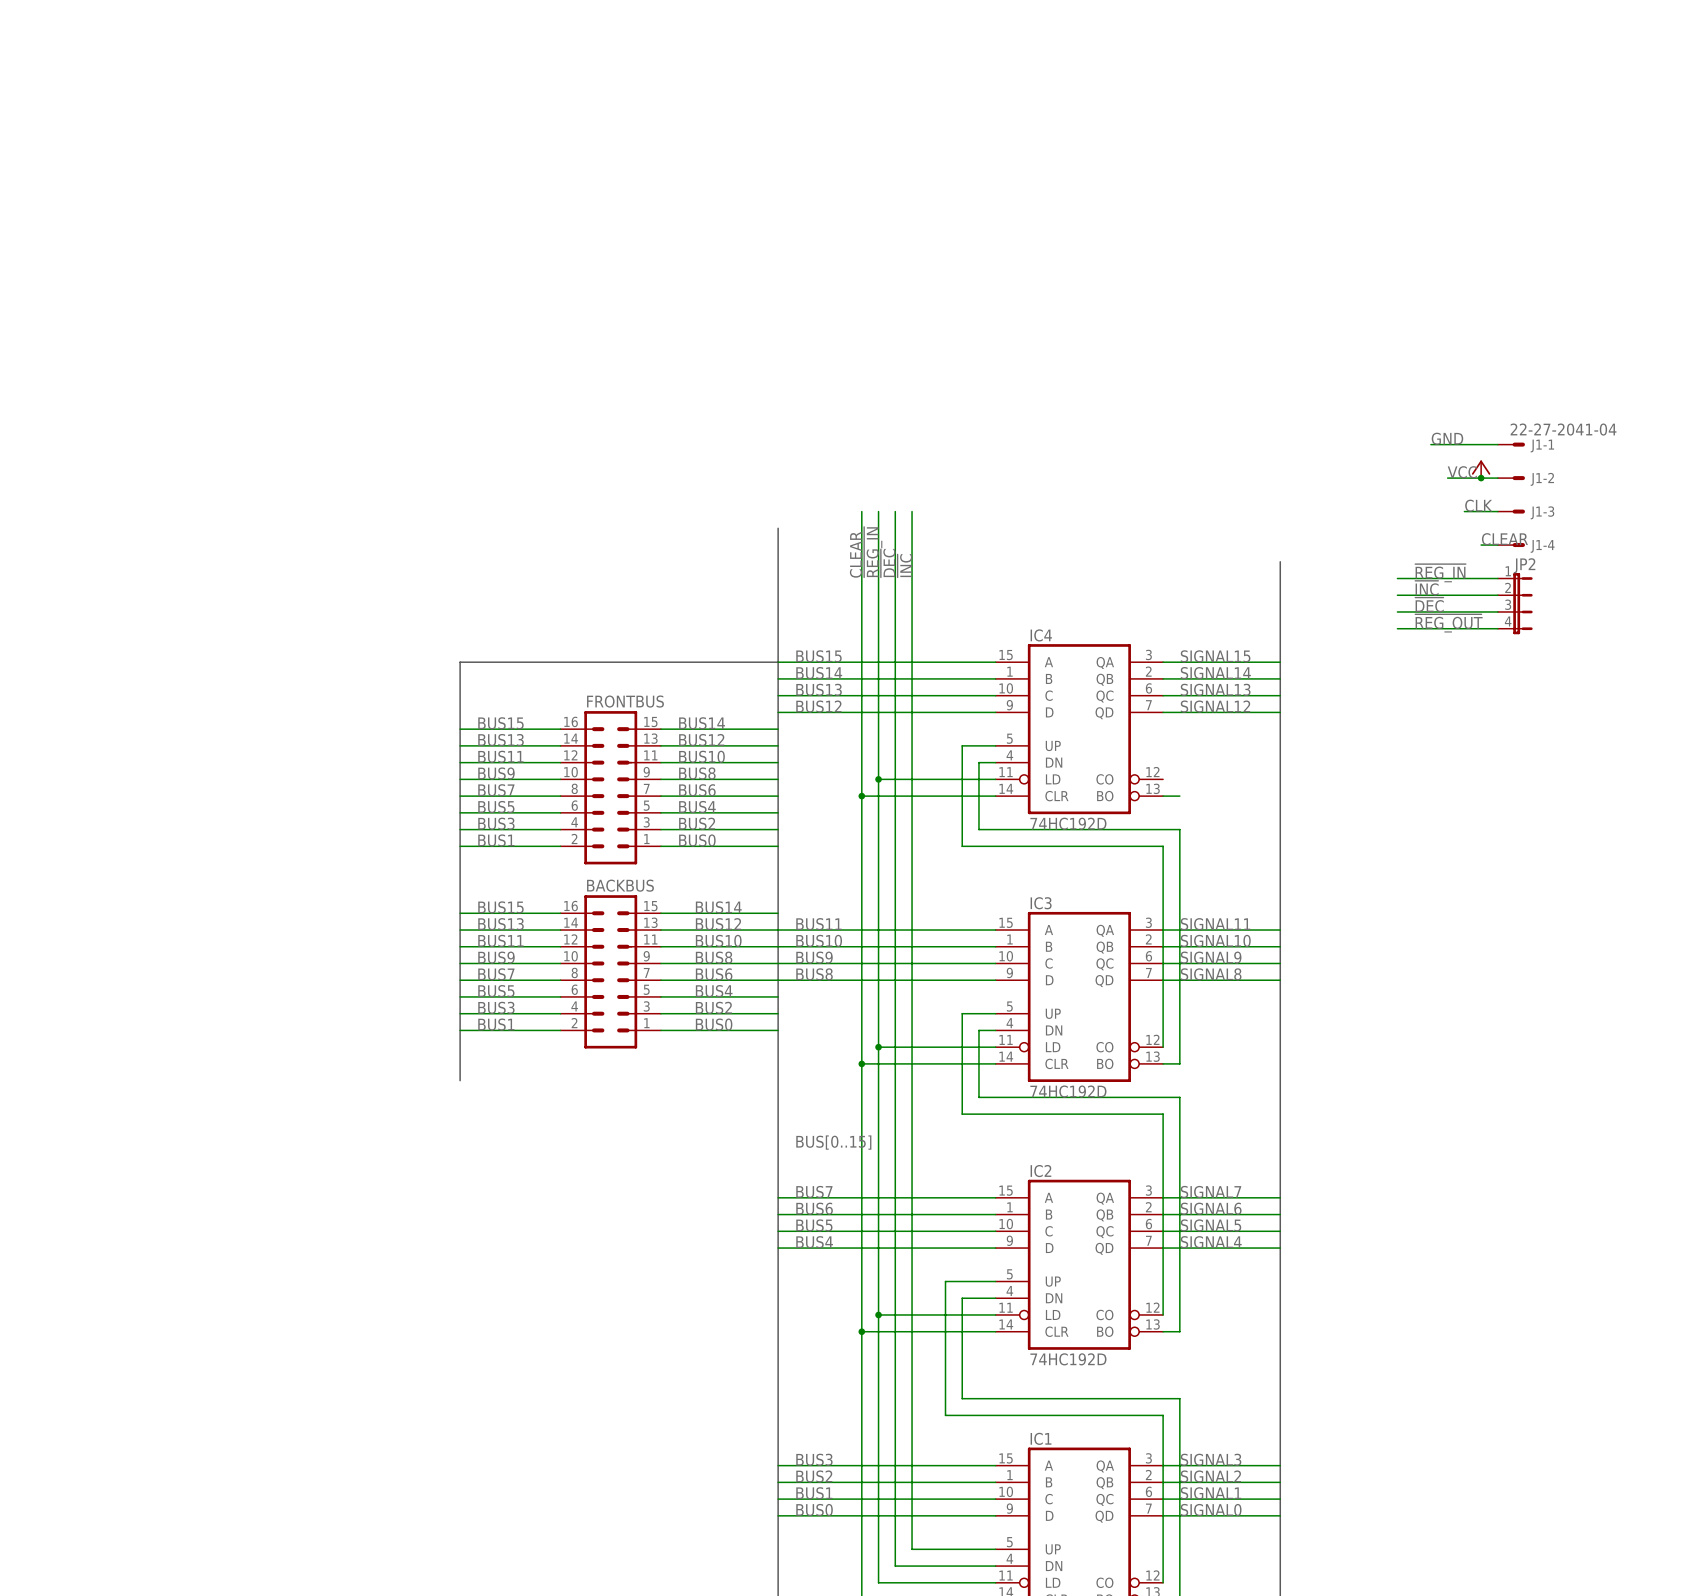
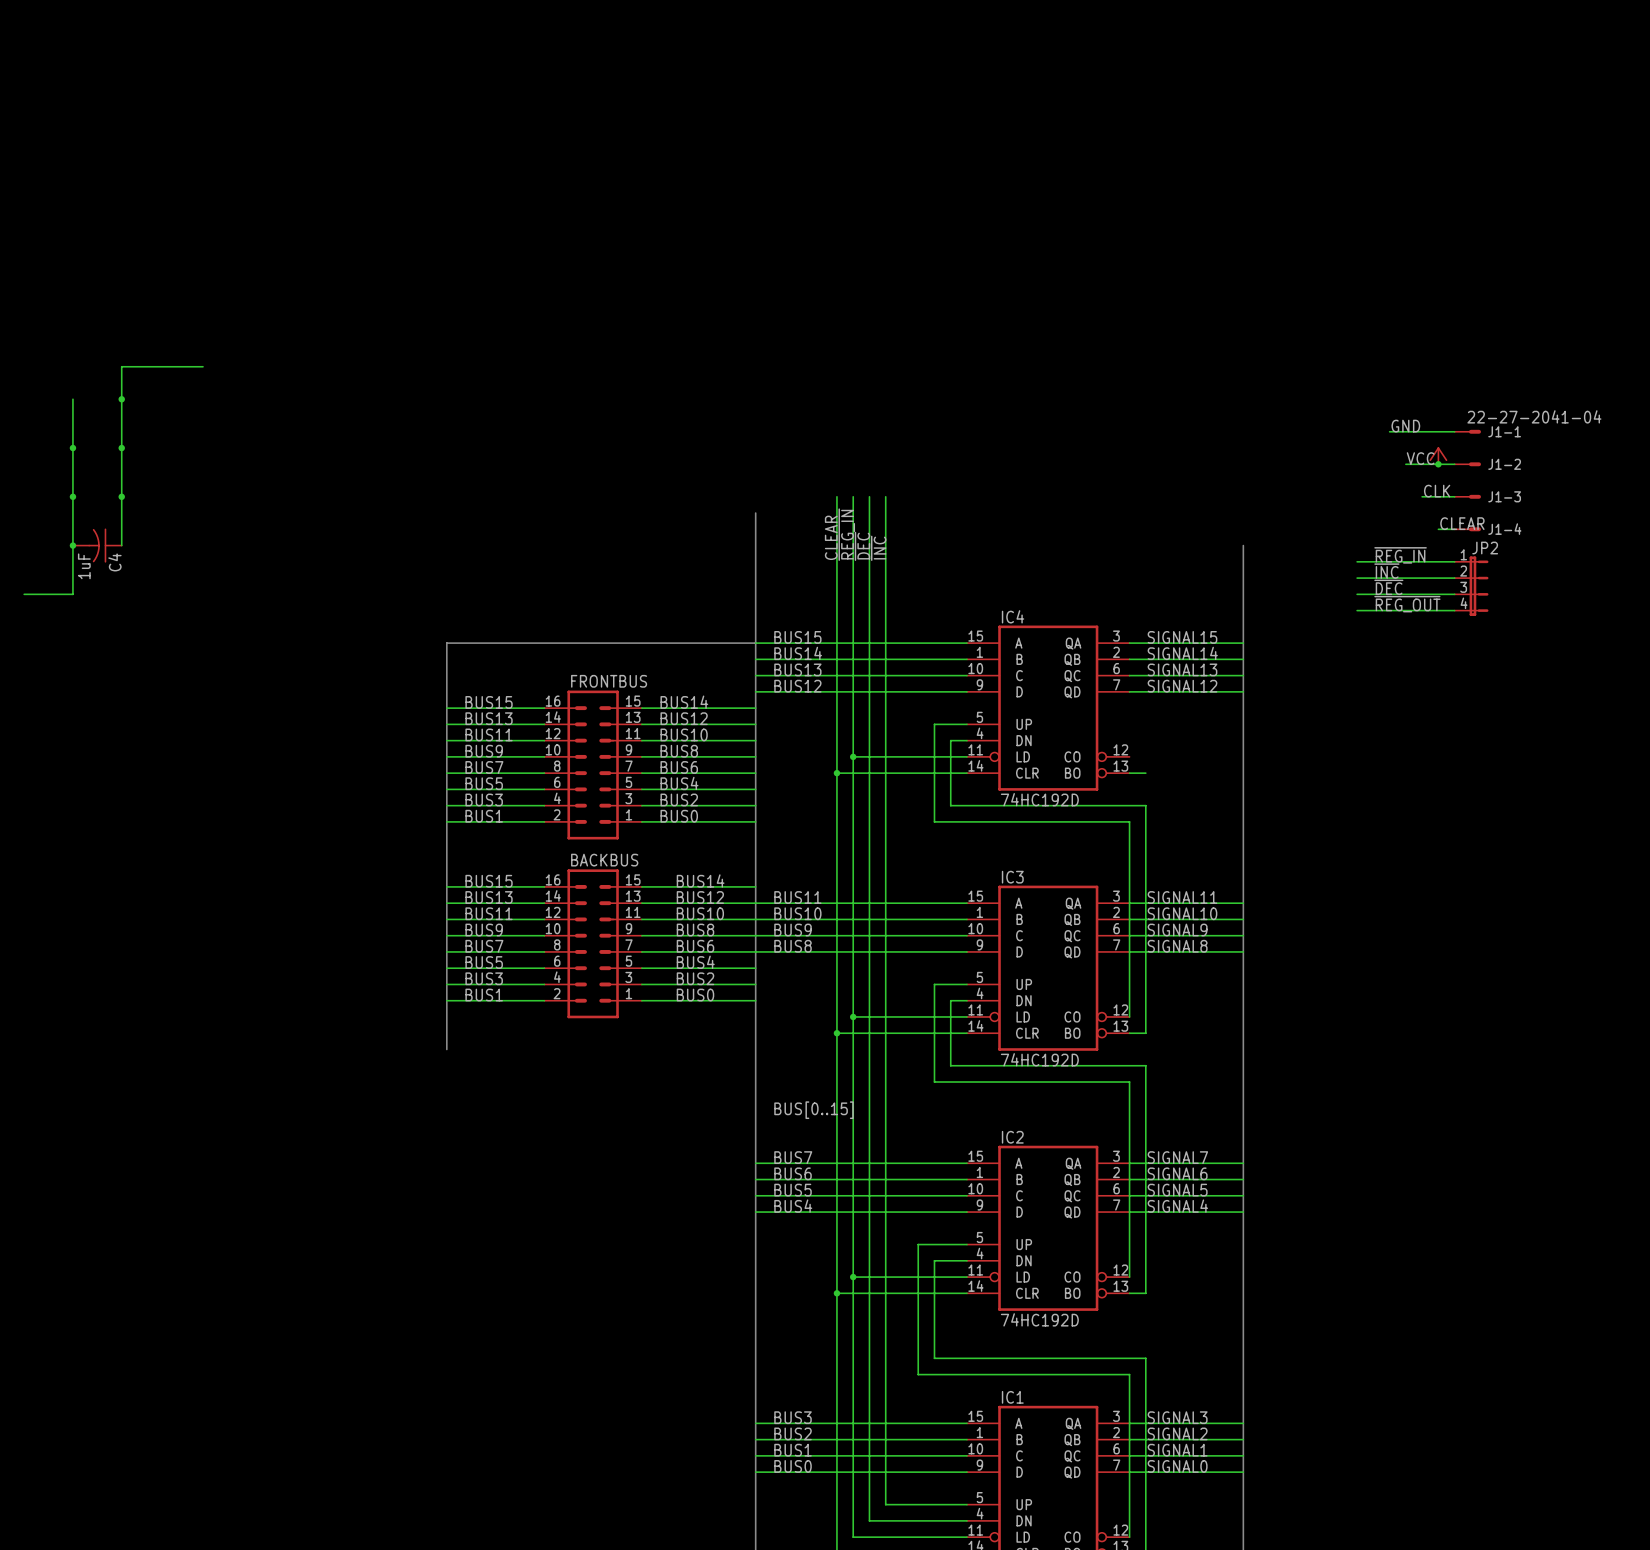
wire: none -> (203, 366) (121, 366) (121, 545)
wire: none -> (72, 399) (72, 594) (24, 594)
junction: none -> (121, 399)
junction: none -> (72, 448)
junction: none -> (121, 448)
junction: none -> (72, 496)
junction: none -> (121, 496)
junction: none -> (72, 545)
C4: none -> 1uF (97, 545)

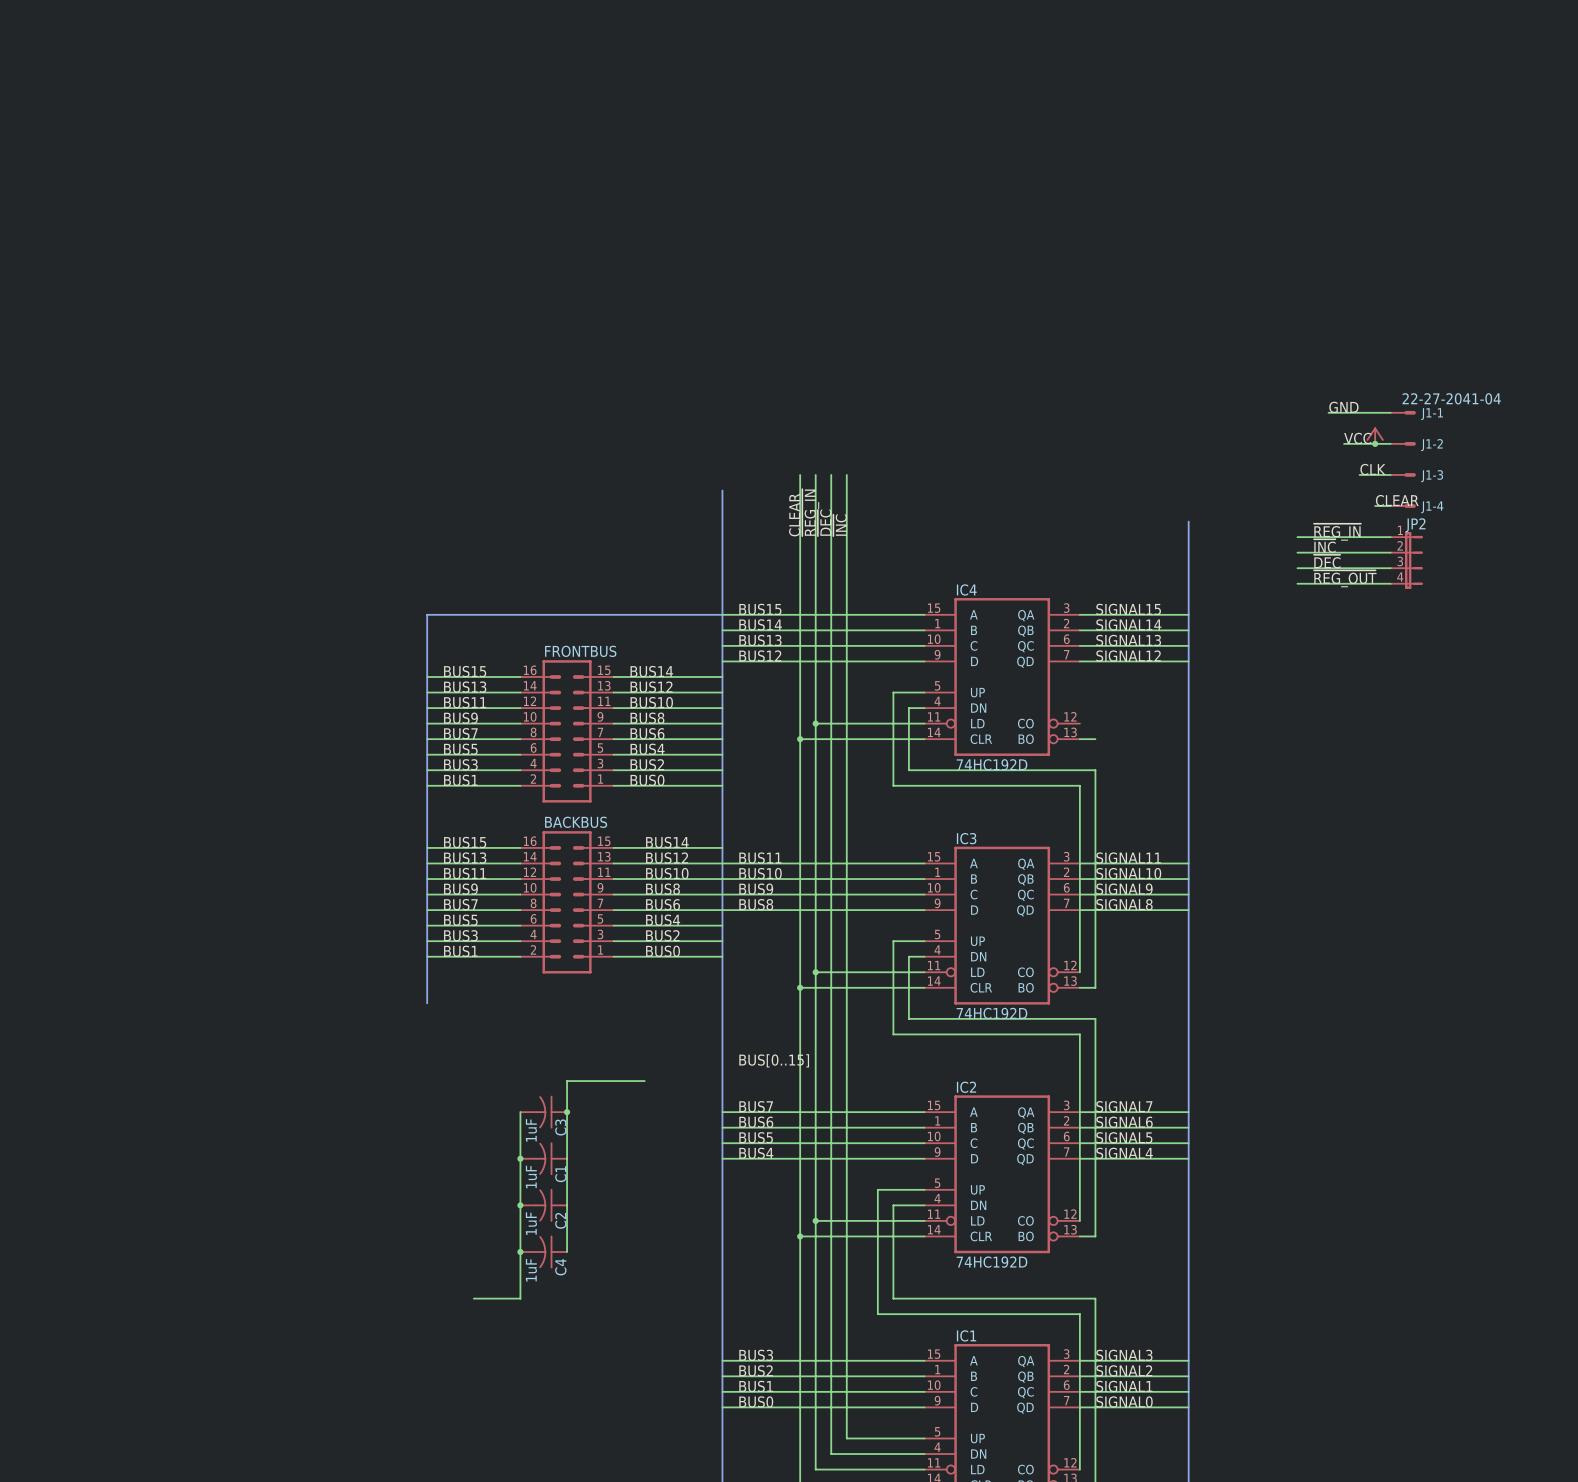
wire: (203, 366) (121, 366) (121, 545) -> none
wire: (72, 399) (72, 594) (24, 594) -> none
junction: (121, 399) -> none
junction: (72, 448) -> none
junction: (121, 448) -> none
junction: (72, 496) -> none
junction: (121, 496) -> none
junction: (72, 545) -> none
C4 position: (97, 545) -> (543, 1251)
wire: none -> (644, 1081) (567, 1081) (567, 1251)
wire: none -> (520, 1112) (520, 1298) (473, 1298)
C3: none -> 1uF (543, 1112)
junction: none -> (567, 1112)
junction: none -> (520, 1158)
C1: none -> 1uF (543, 1158)
junction: none -> (520, 1205)
C2: none -> 1uF (543, 1205)
junction: none -> (520, 1251)

